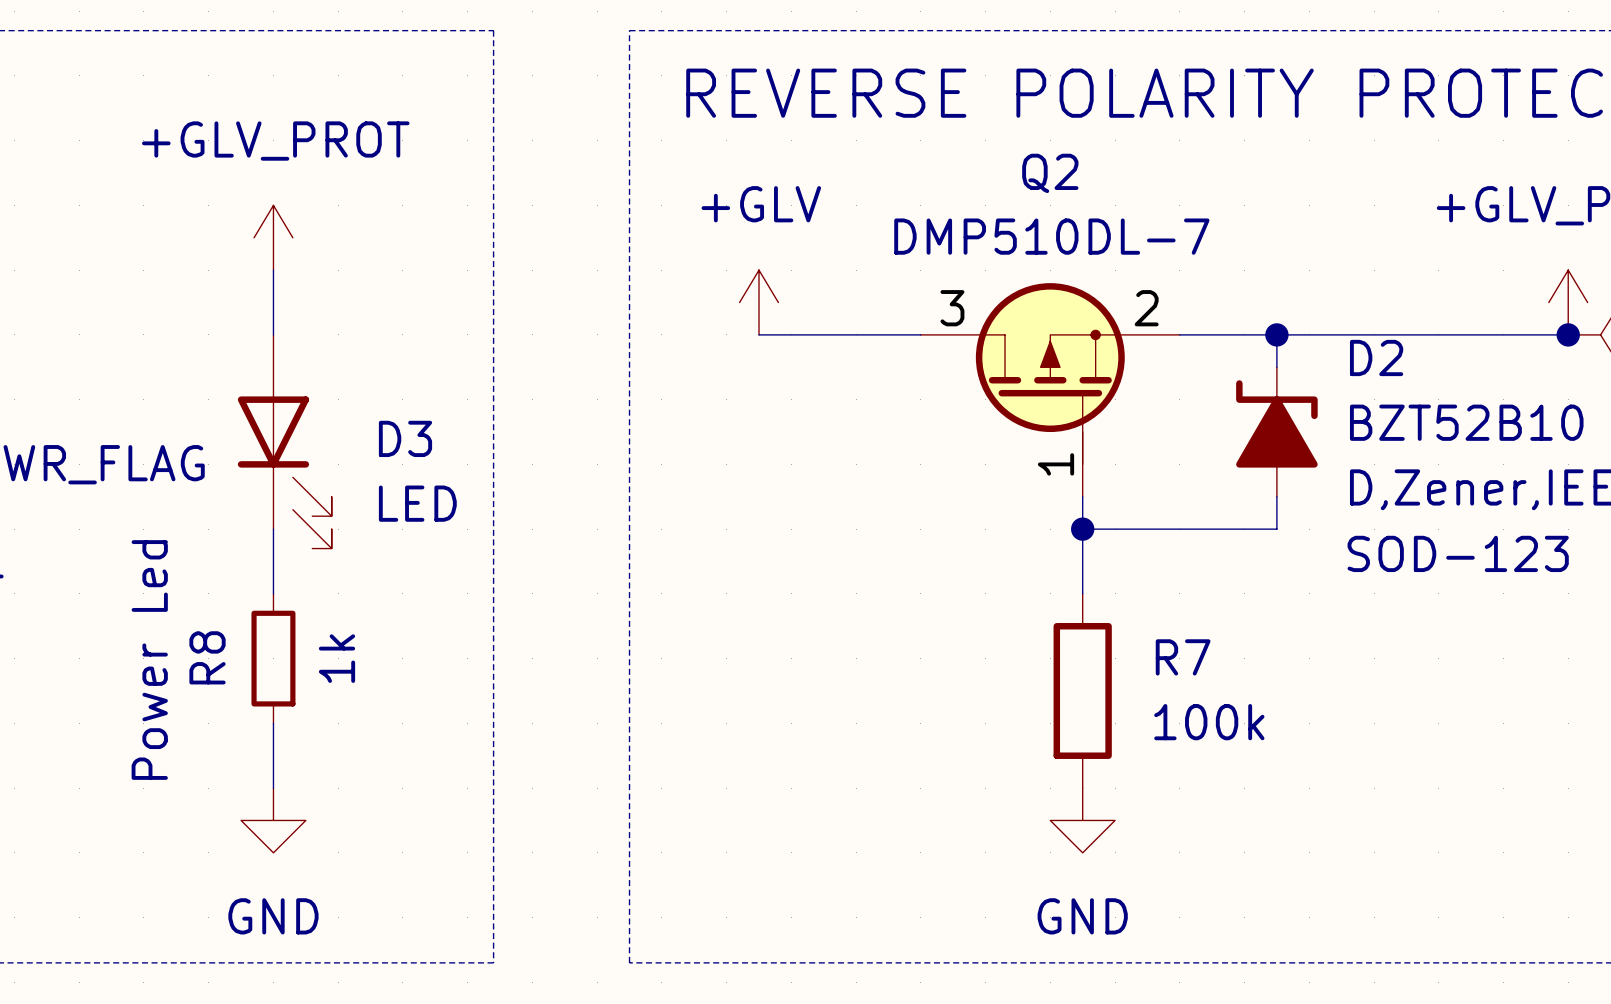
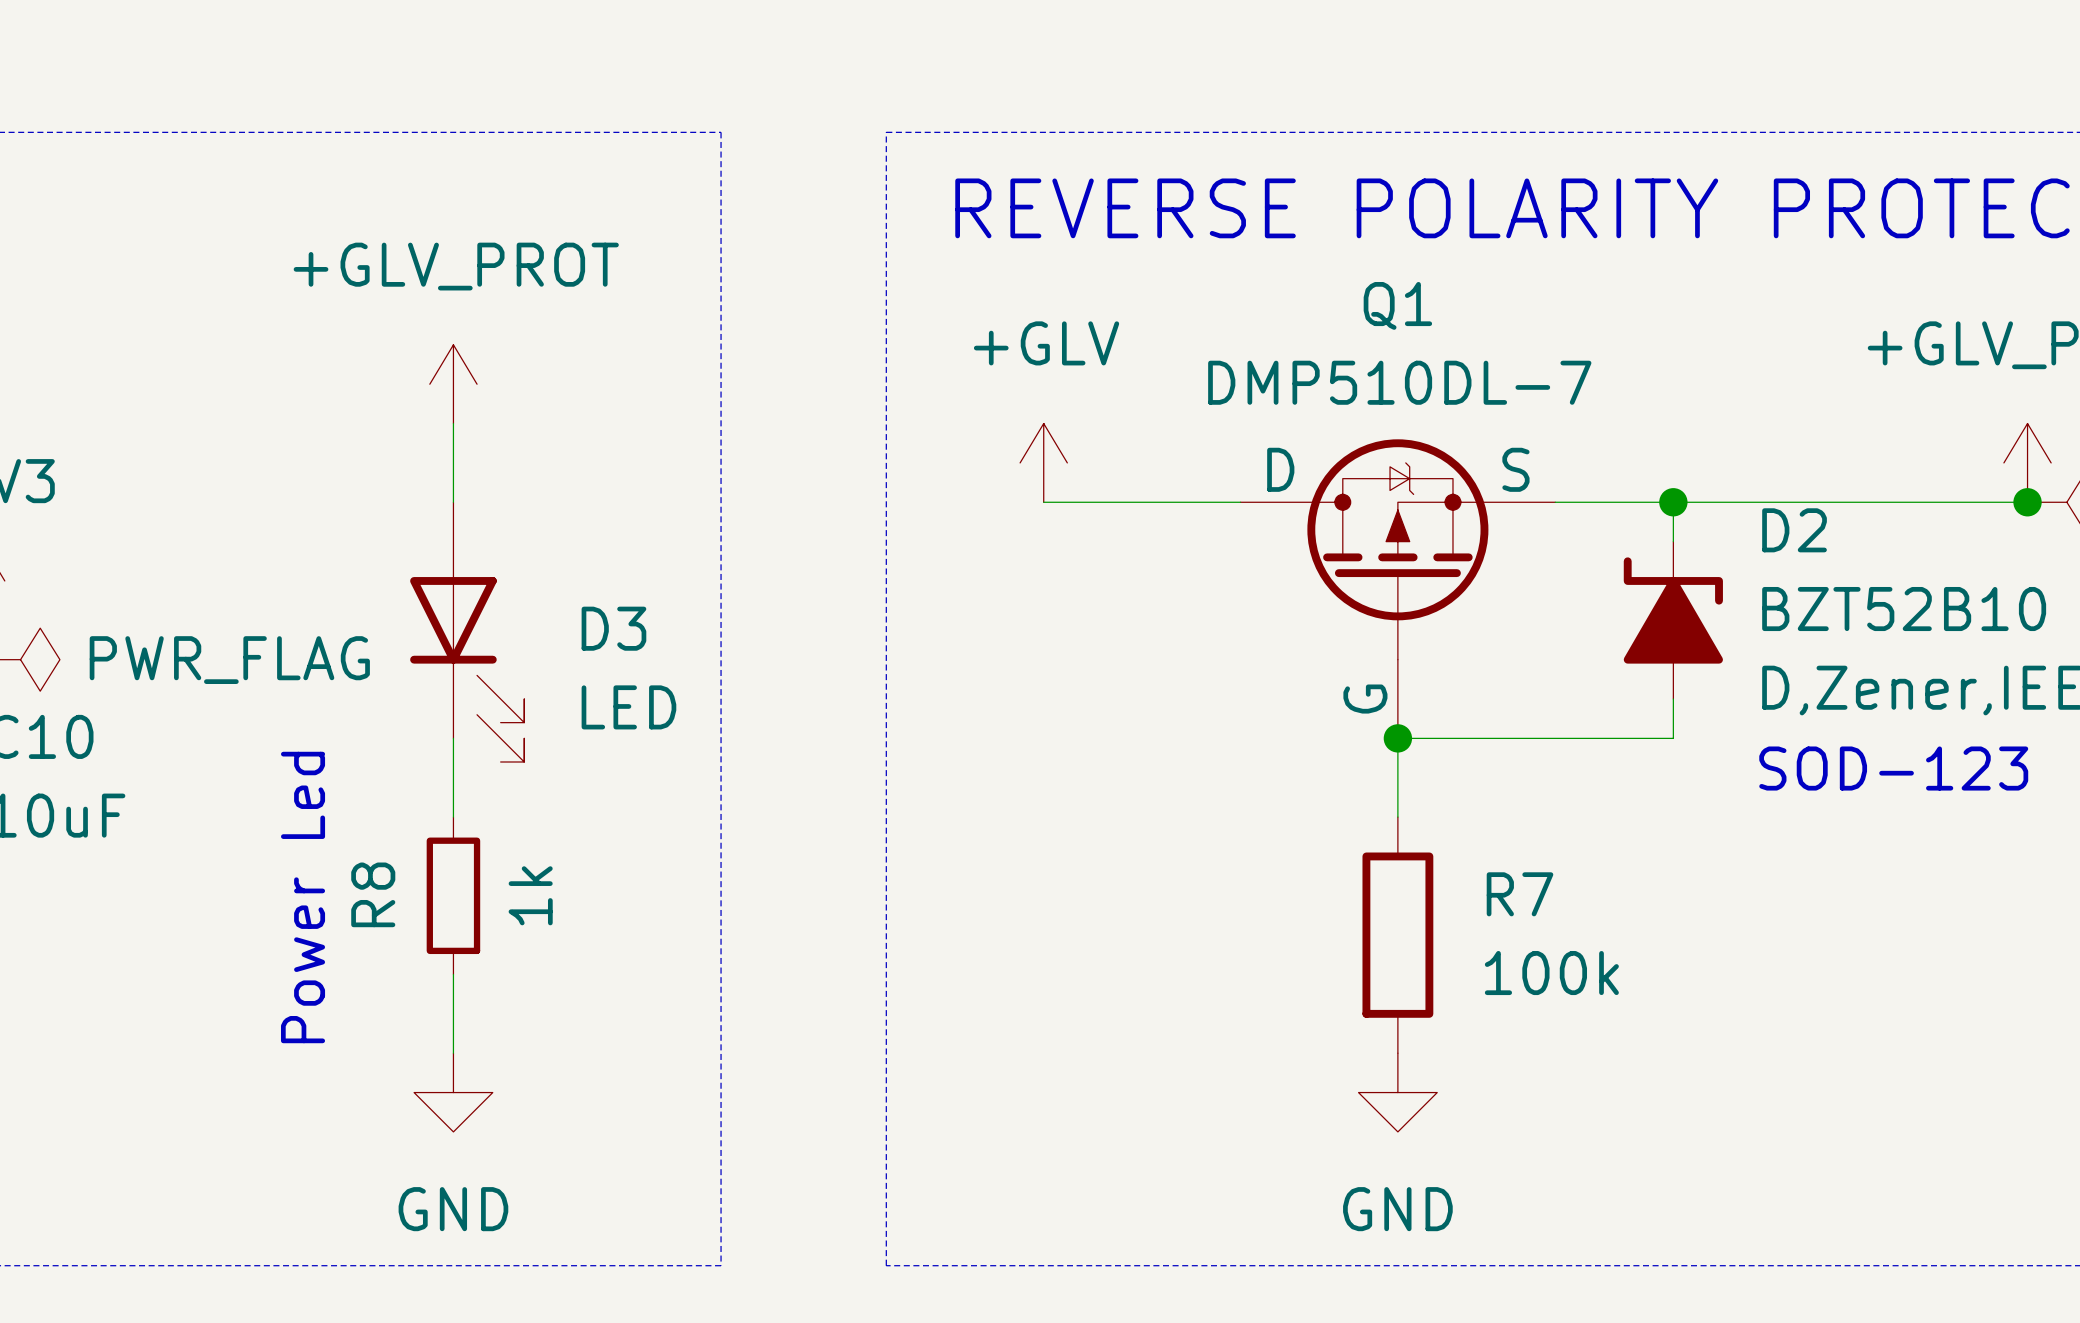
Q2: DMP510DL-7 (1050, 389) -> none
Q1: none -> DMP510DL-7 (1397, 588)
wire: (1082, 496) (1082, 593) -> none
wire: none -> (1437, 738) (1397, 738) (1397, 817)
junction position: (1082, 529) -> (1397, 738)
R7 position: (1082, 690) -> (1397, 935)
power symbol position: GND (1082, 820) -> GND (1397, 1092)

